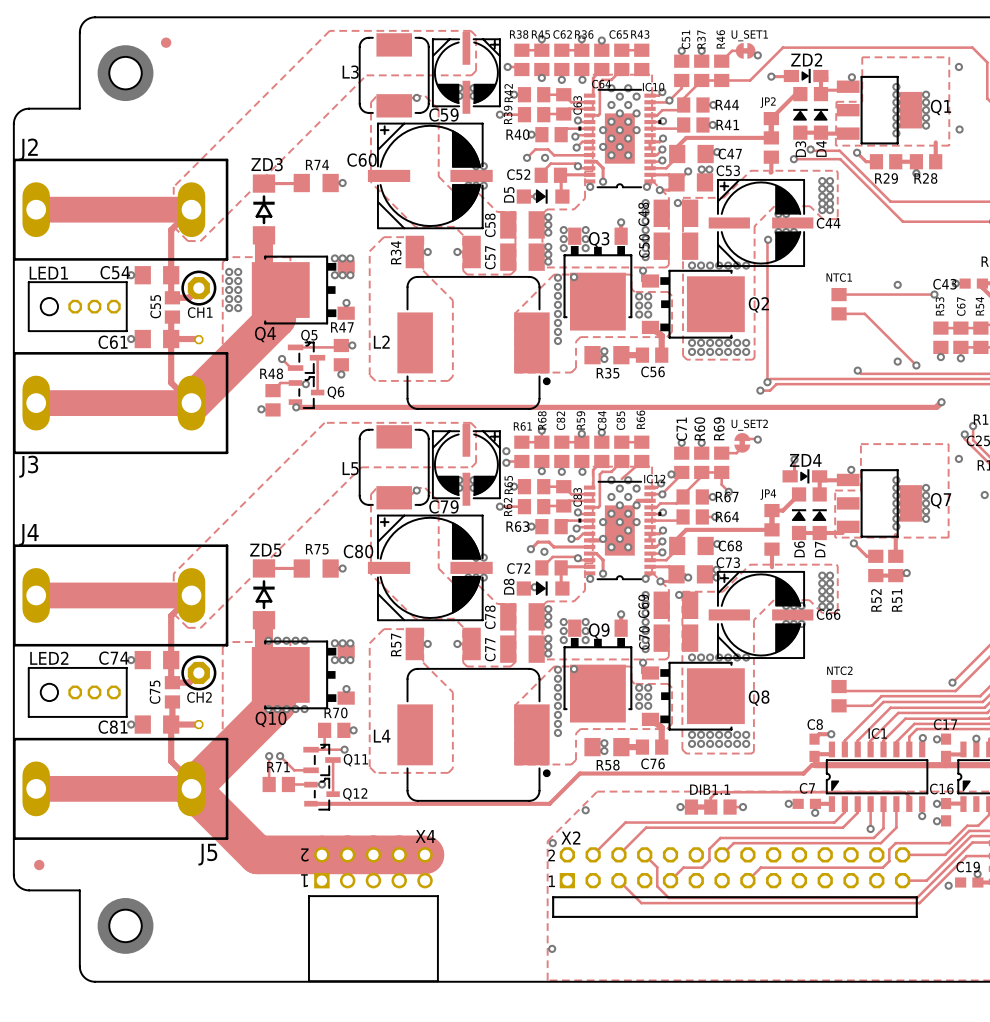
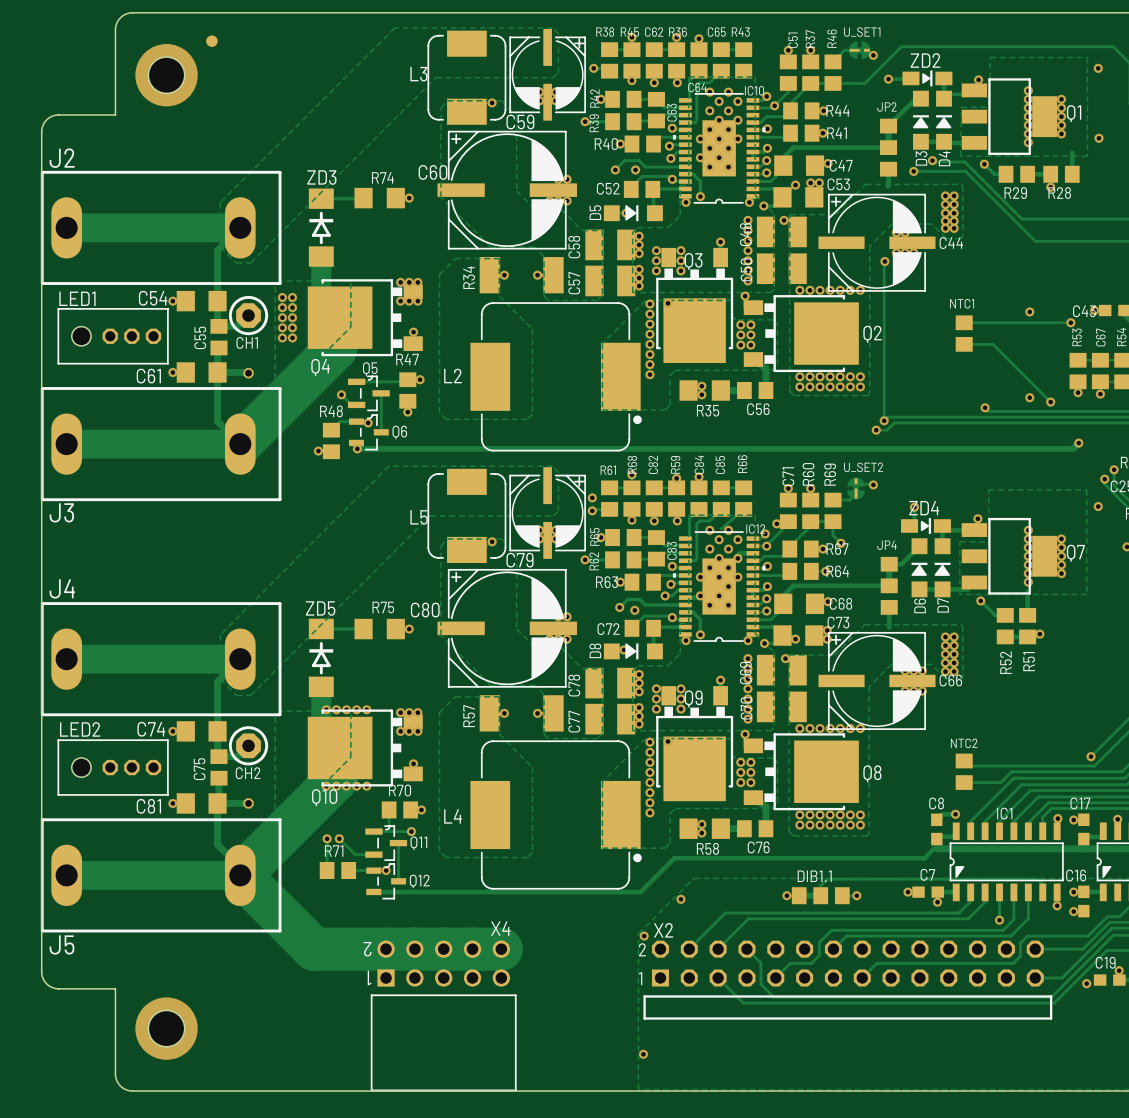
J5 name position: J5 (207, 854) -> J5 (61, 944)
part: (39, 865) -> none

